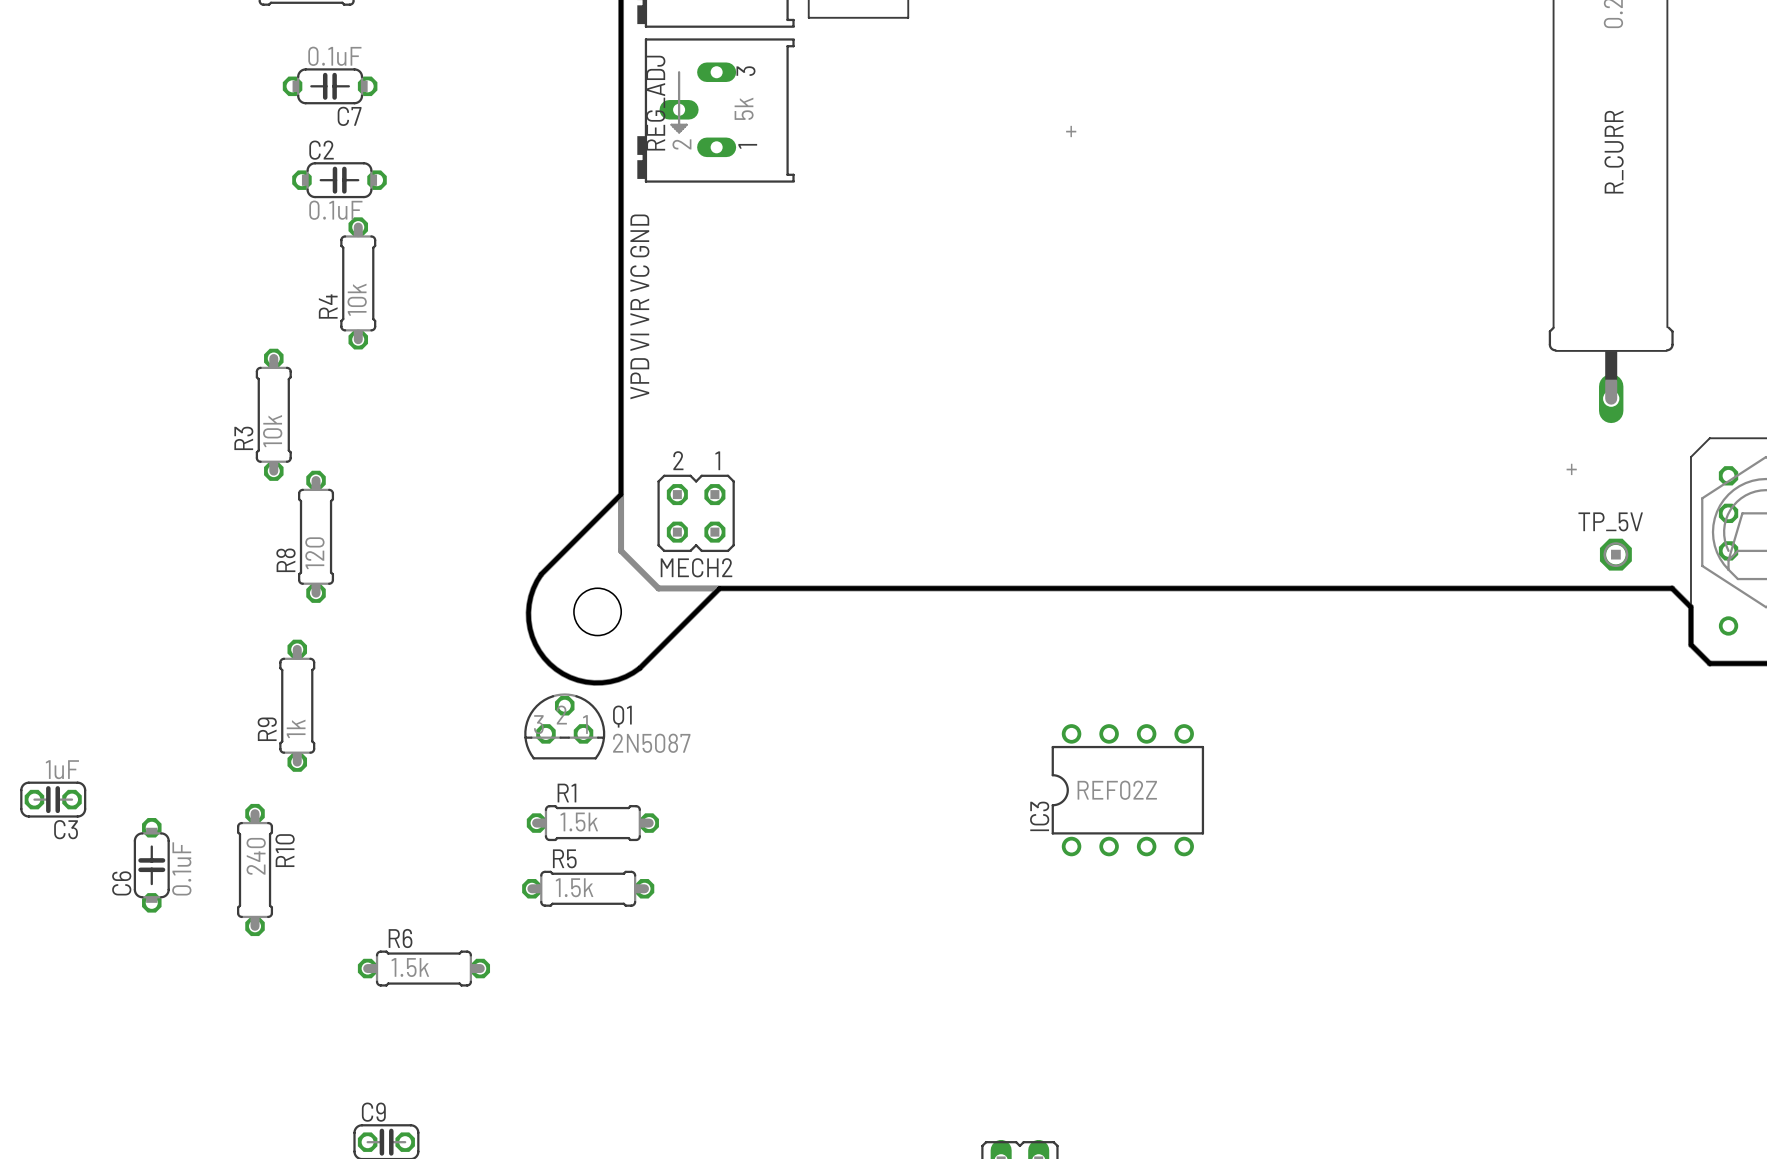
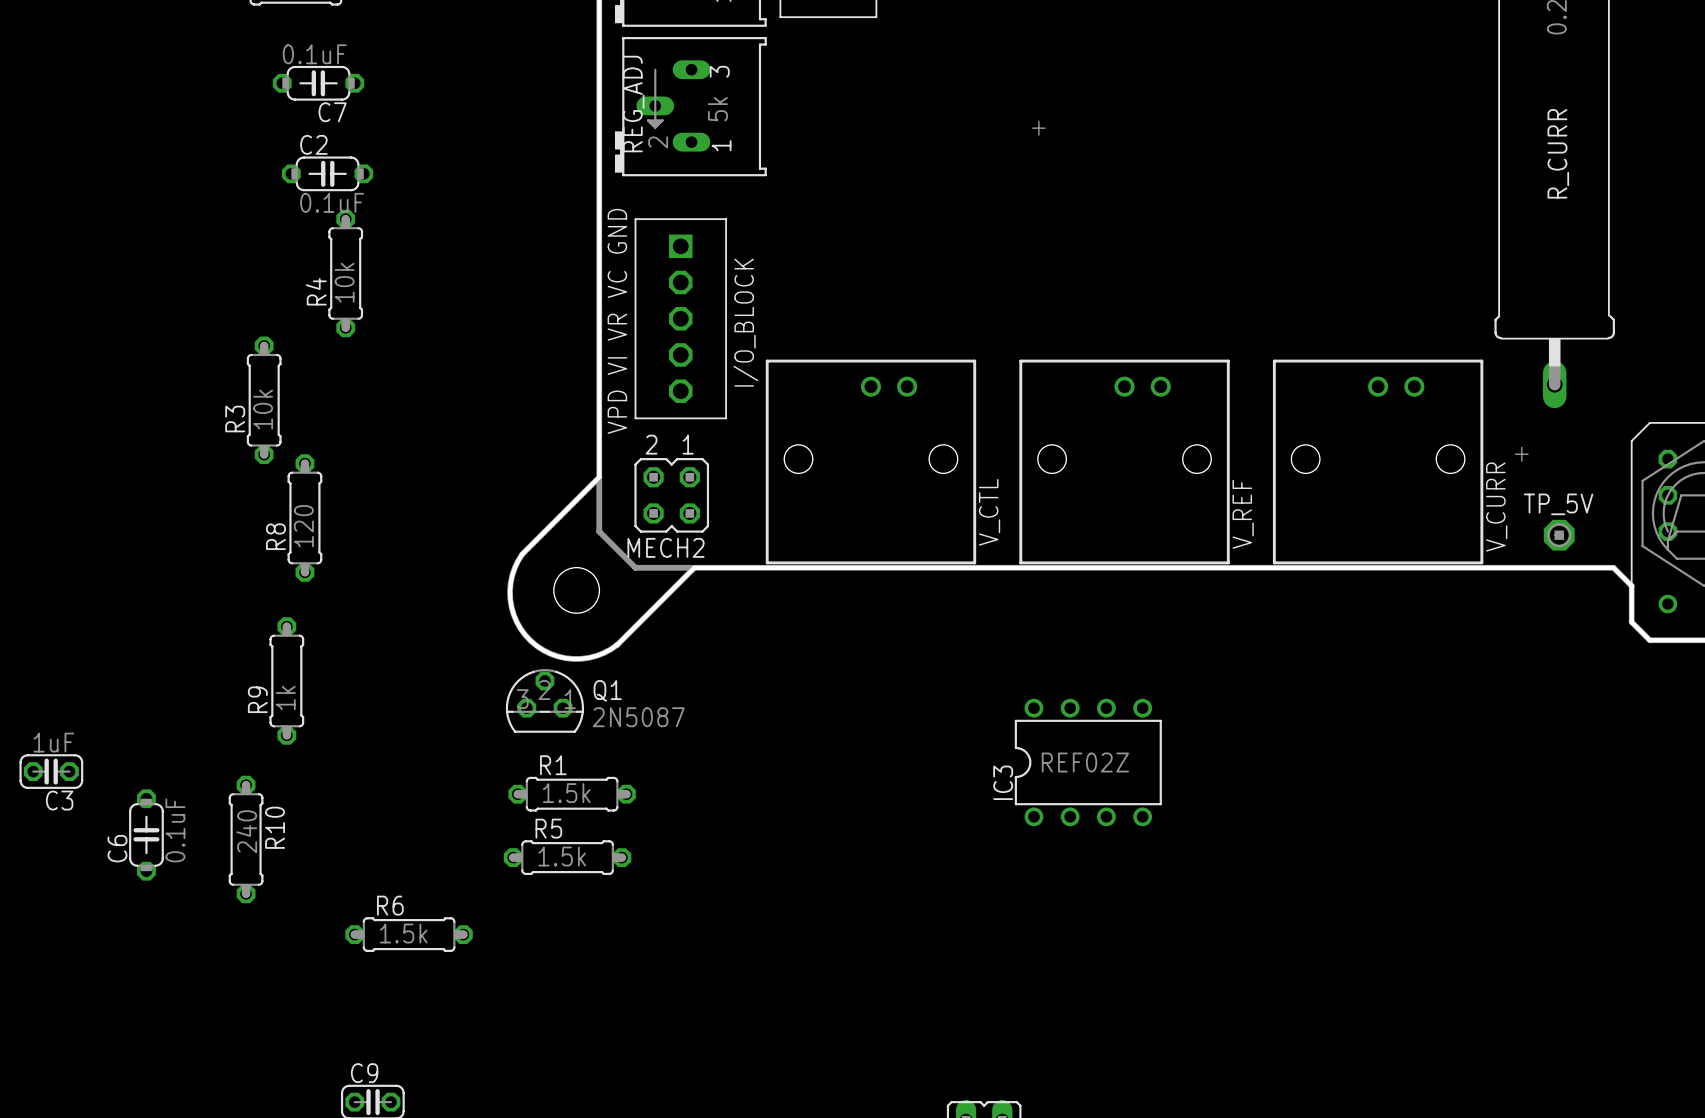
I/O_BLOCK: none -> (680, 318)
V_CTL: none -> (870, 461)
V_REF: none -> (1124, 461)
V_CURR: none -> (1378, 461)

